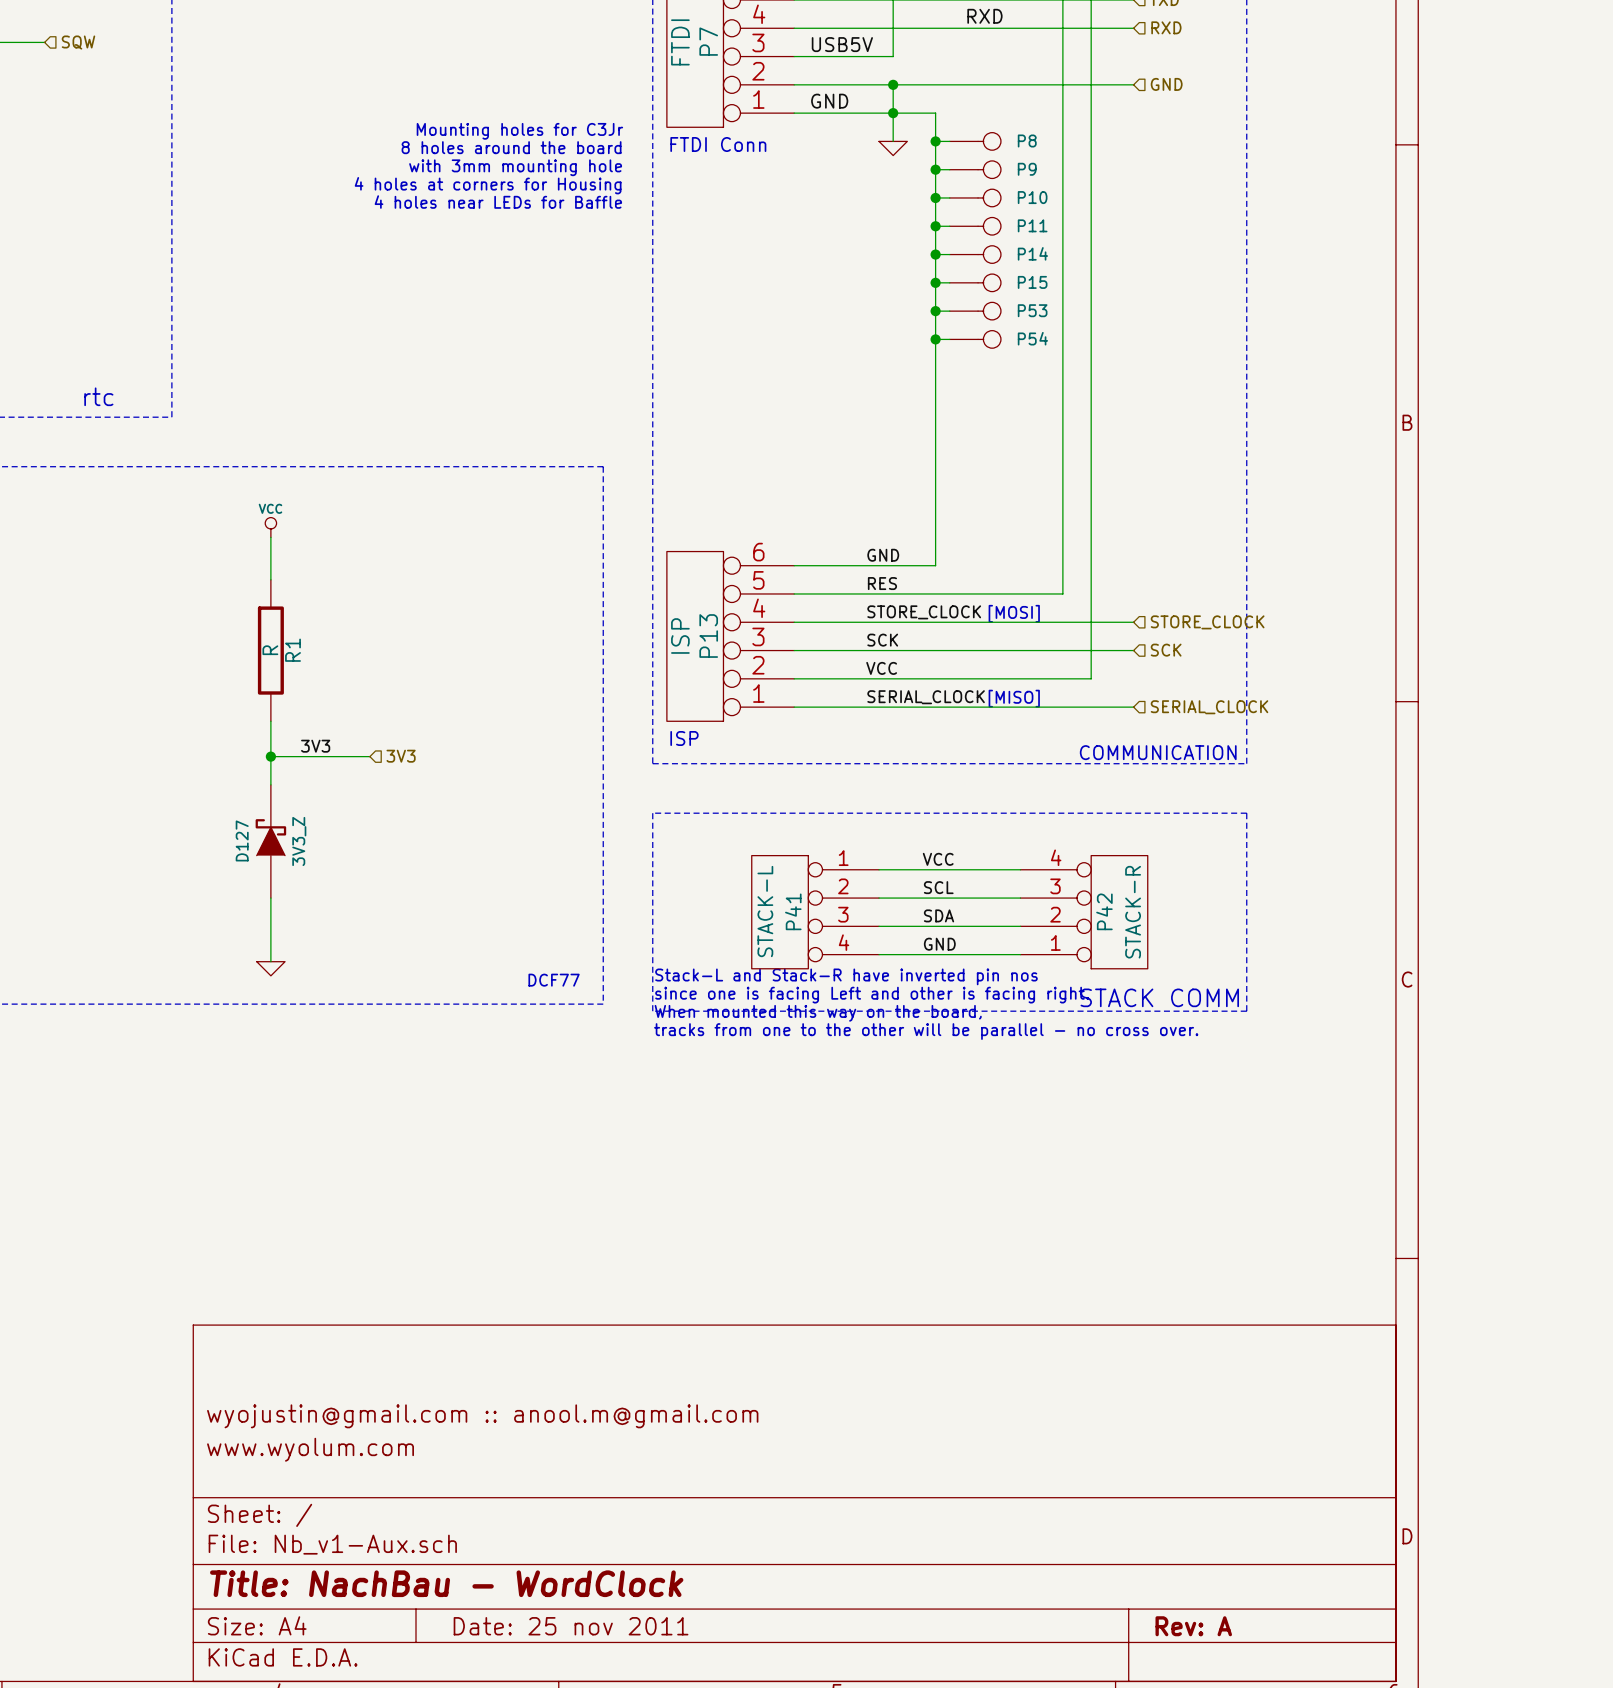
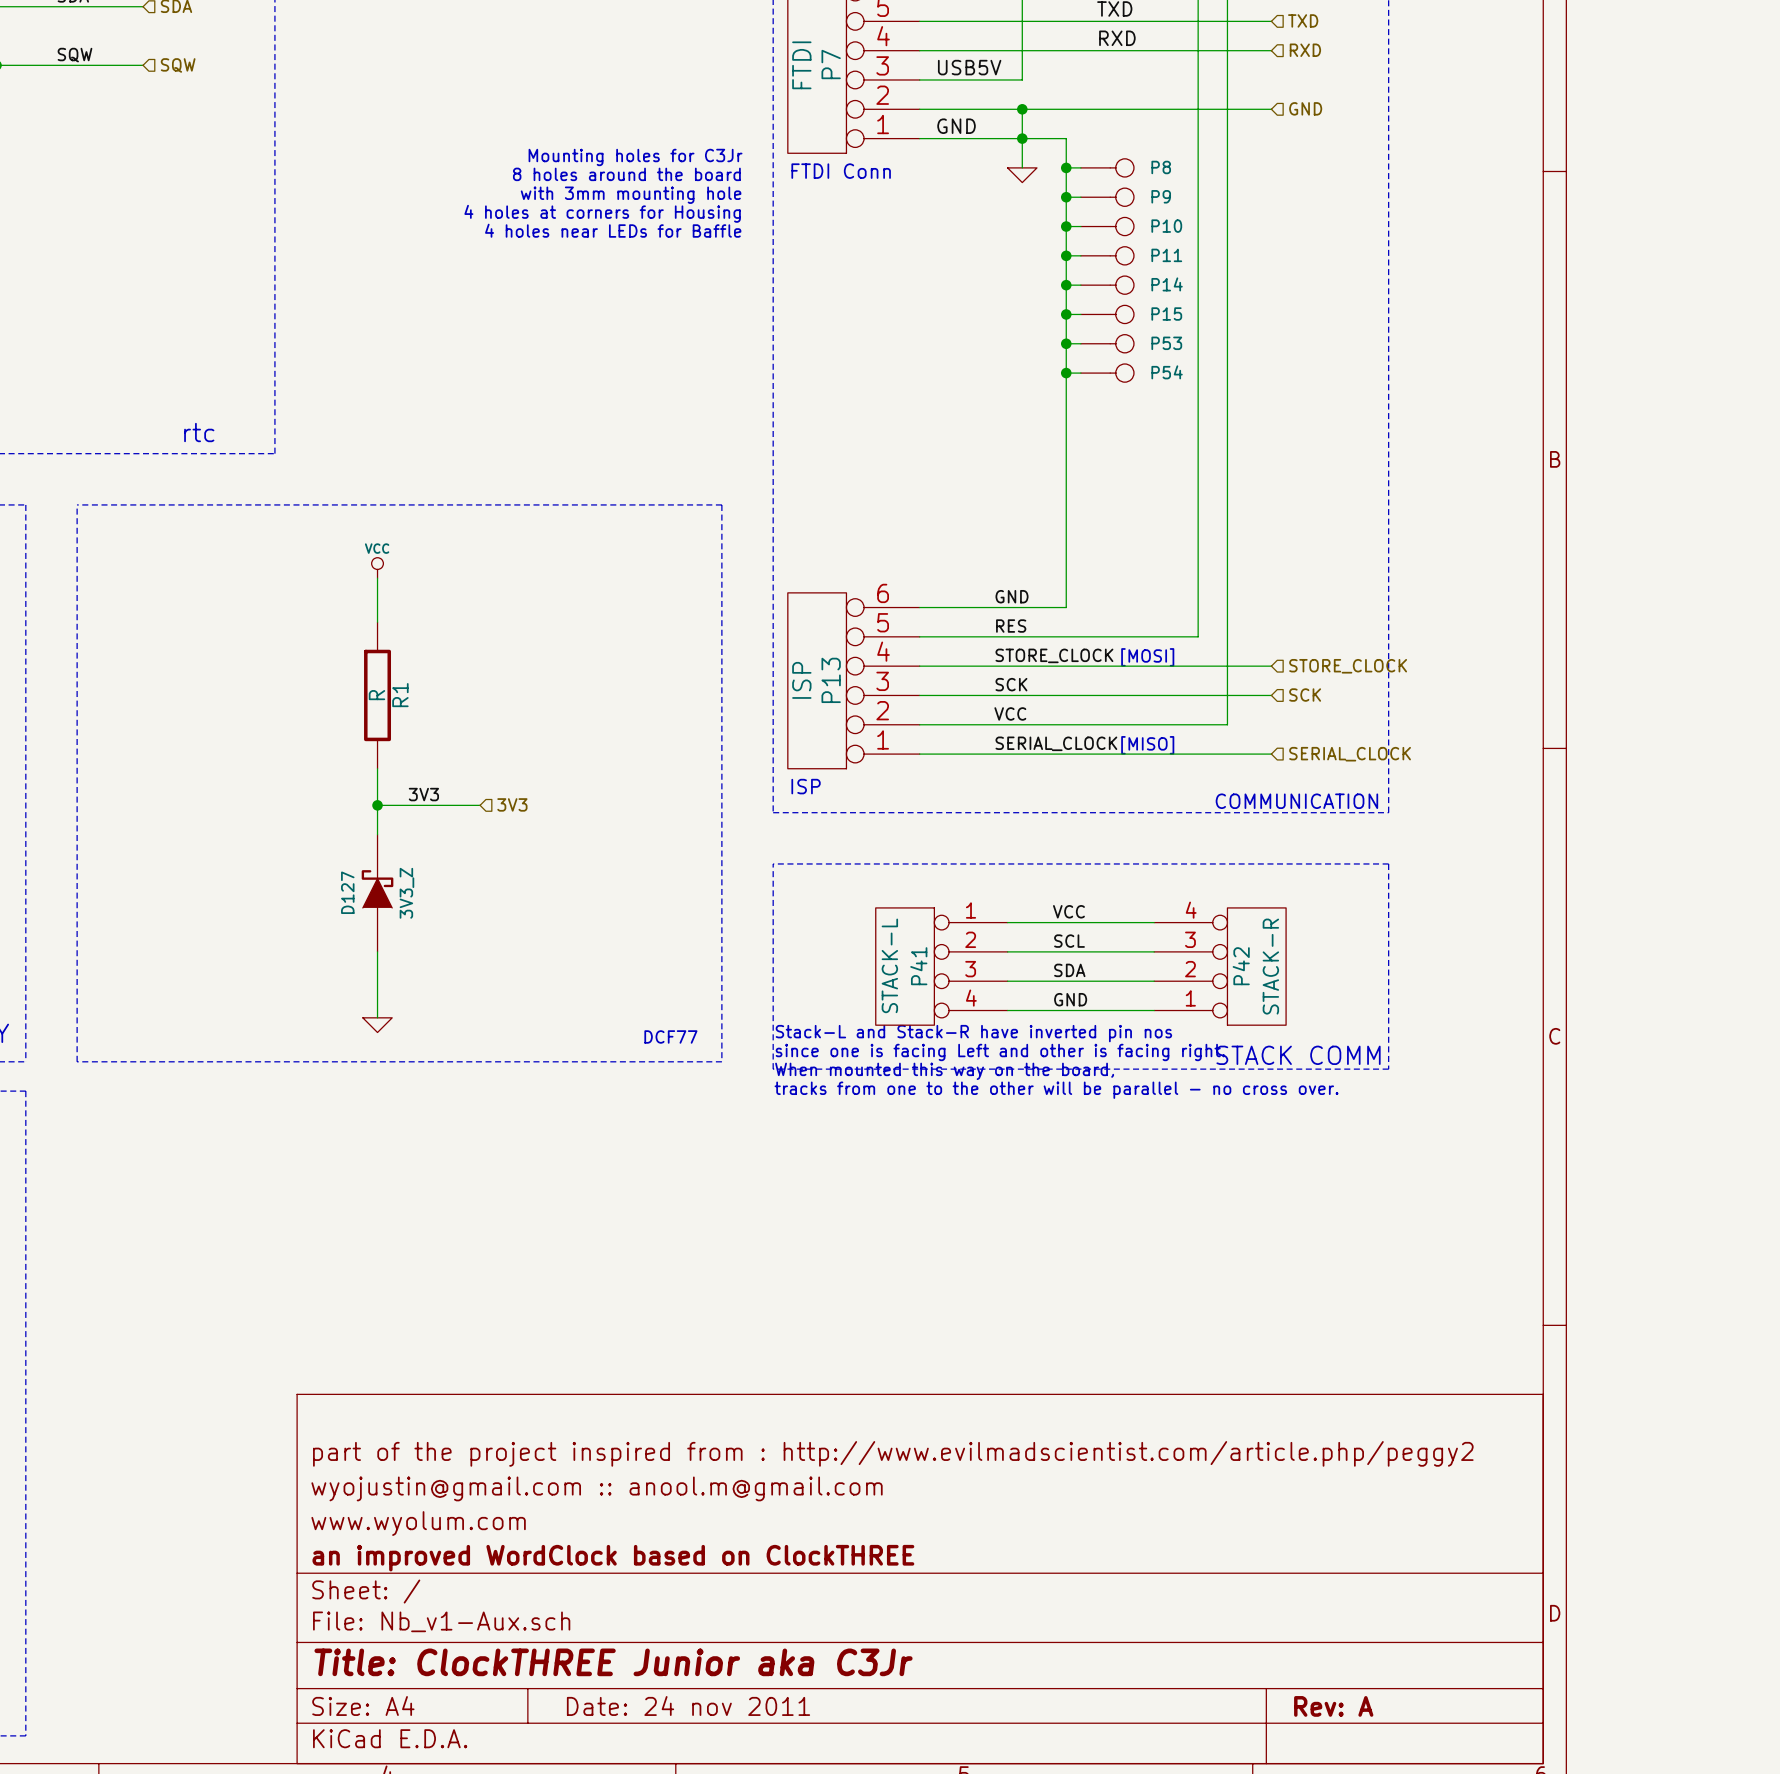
title block: none -> part of the project inspired from : http://www.evilmadscientist.com/article.php/peggy2 (893, 1453)
title block: none -> an improved WordClock based on ClockTHREE (613, 1558)
title block: Title: NachBau - WordClock (446, 1583) -> Title: ClockTHREE Junior aka C3Jr (613, 1662)
title block: Date: 25 nov 2011 (571, 1626) -> Date: 24 nov 2011 (688, 1706)

